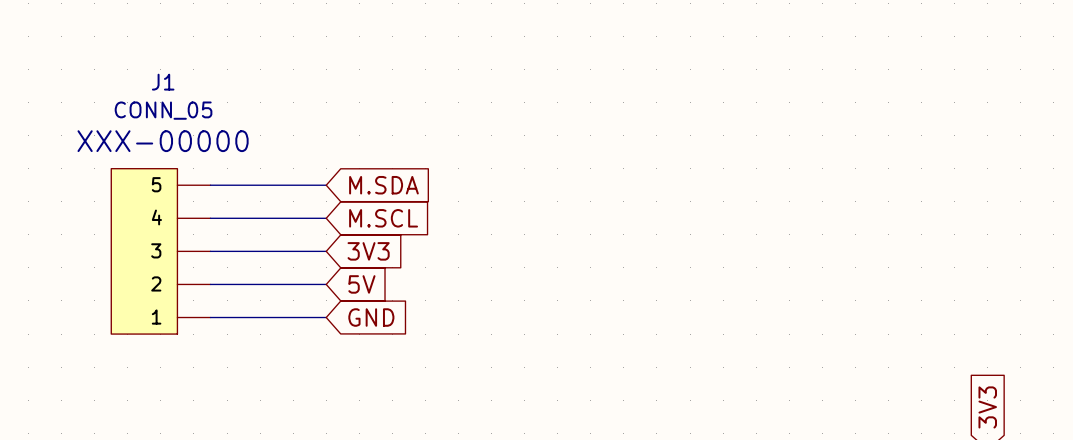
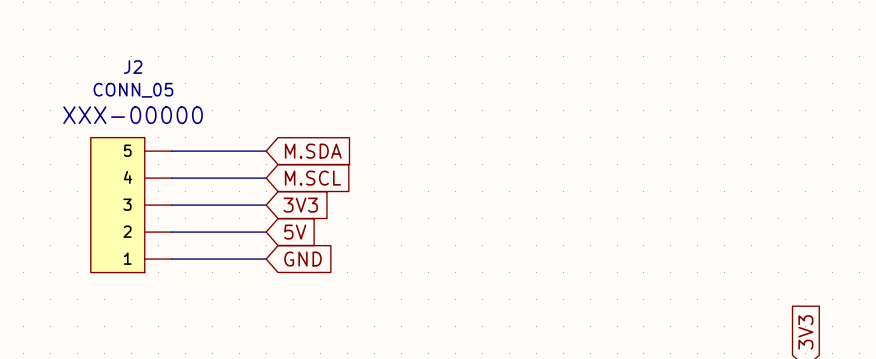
J1 name: J1 (163, 82) -> J2 (133, 67)

